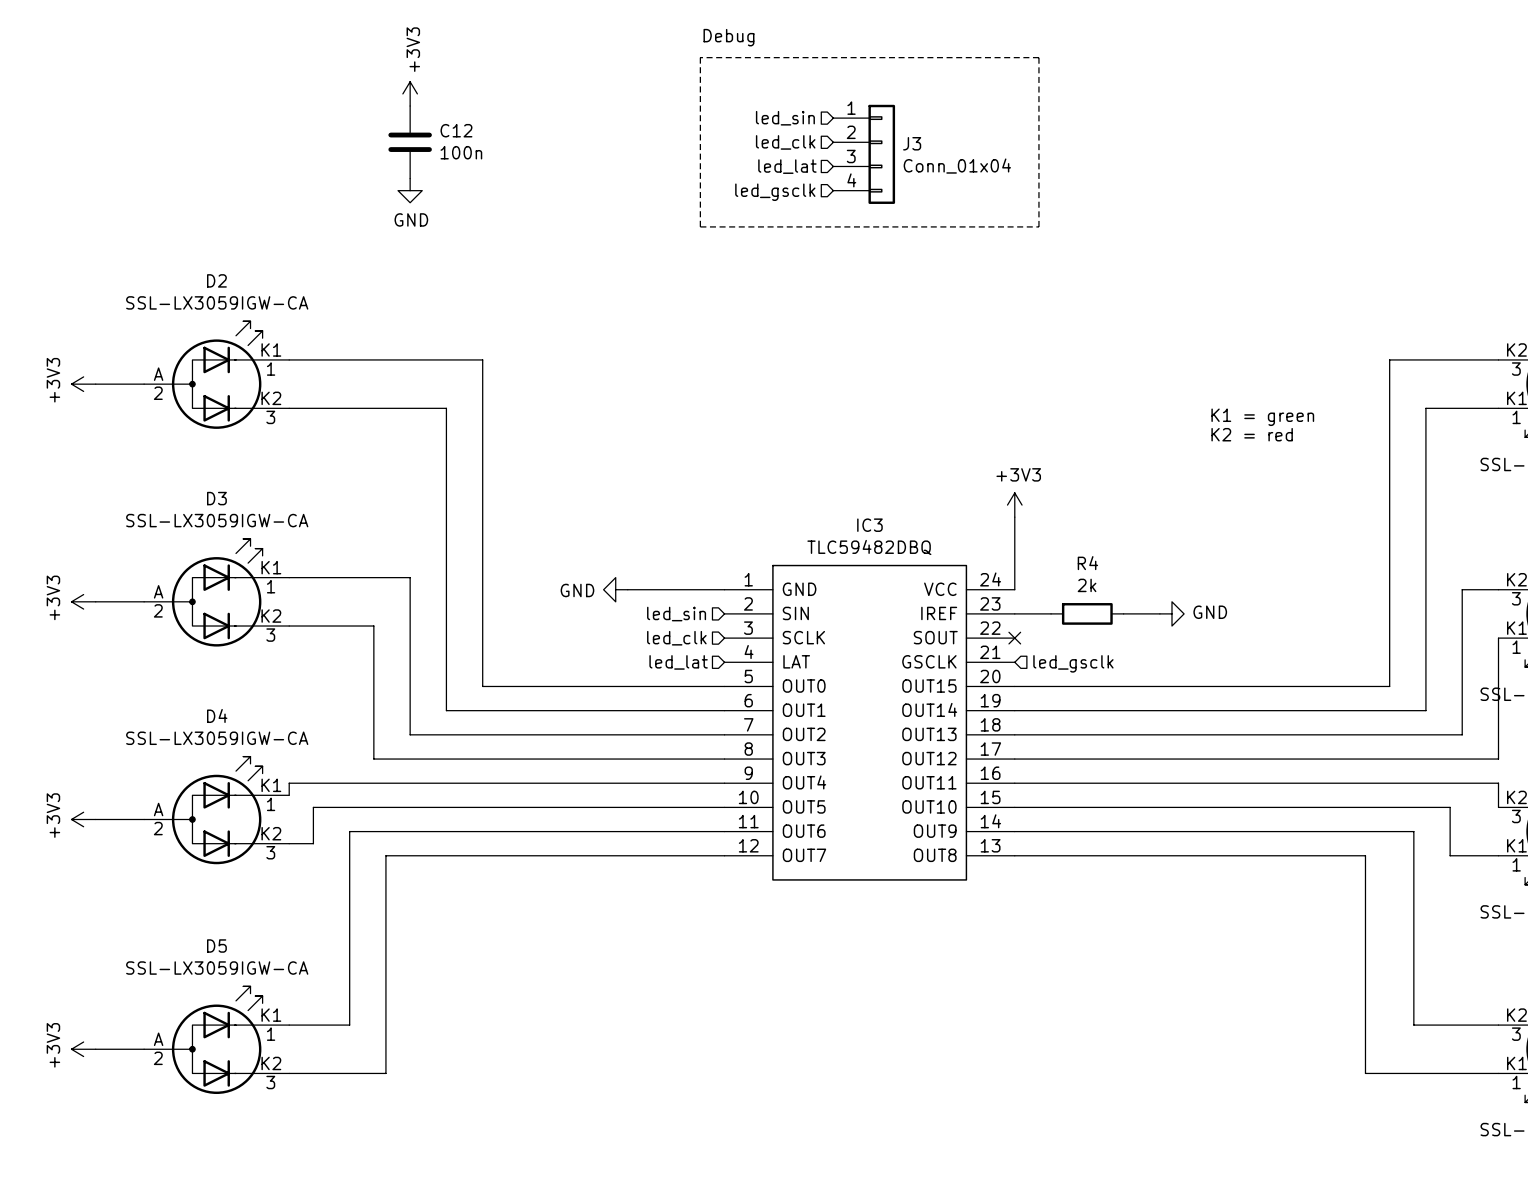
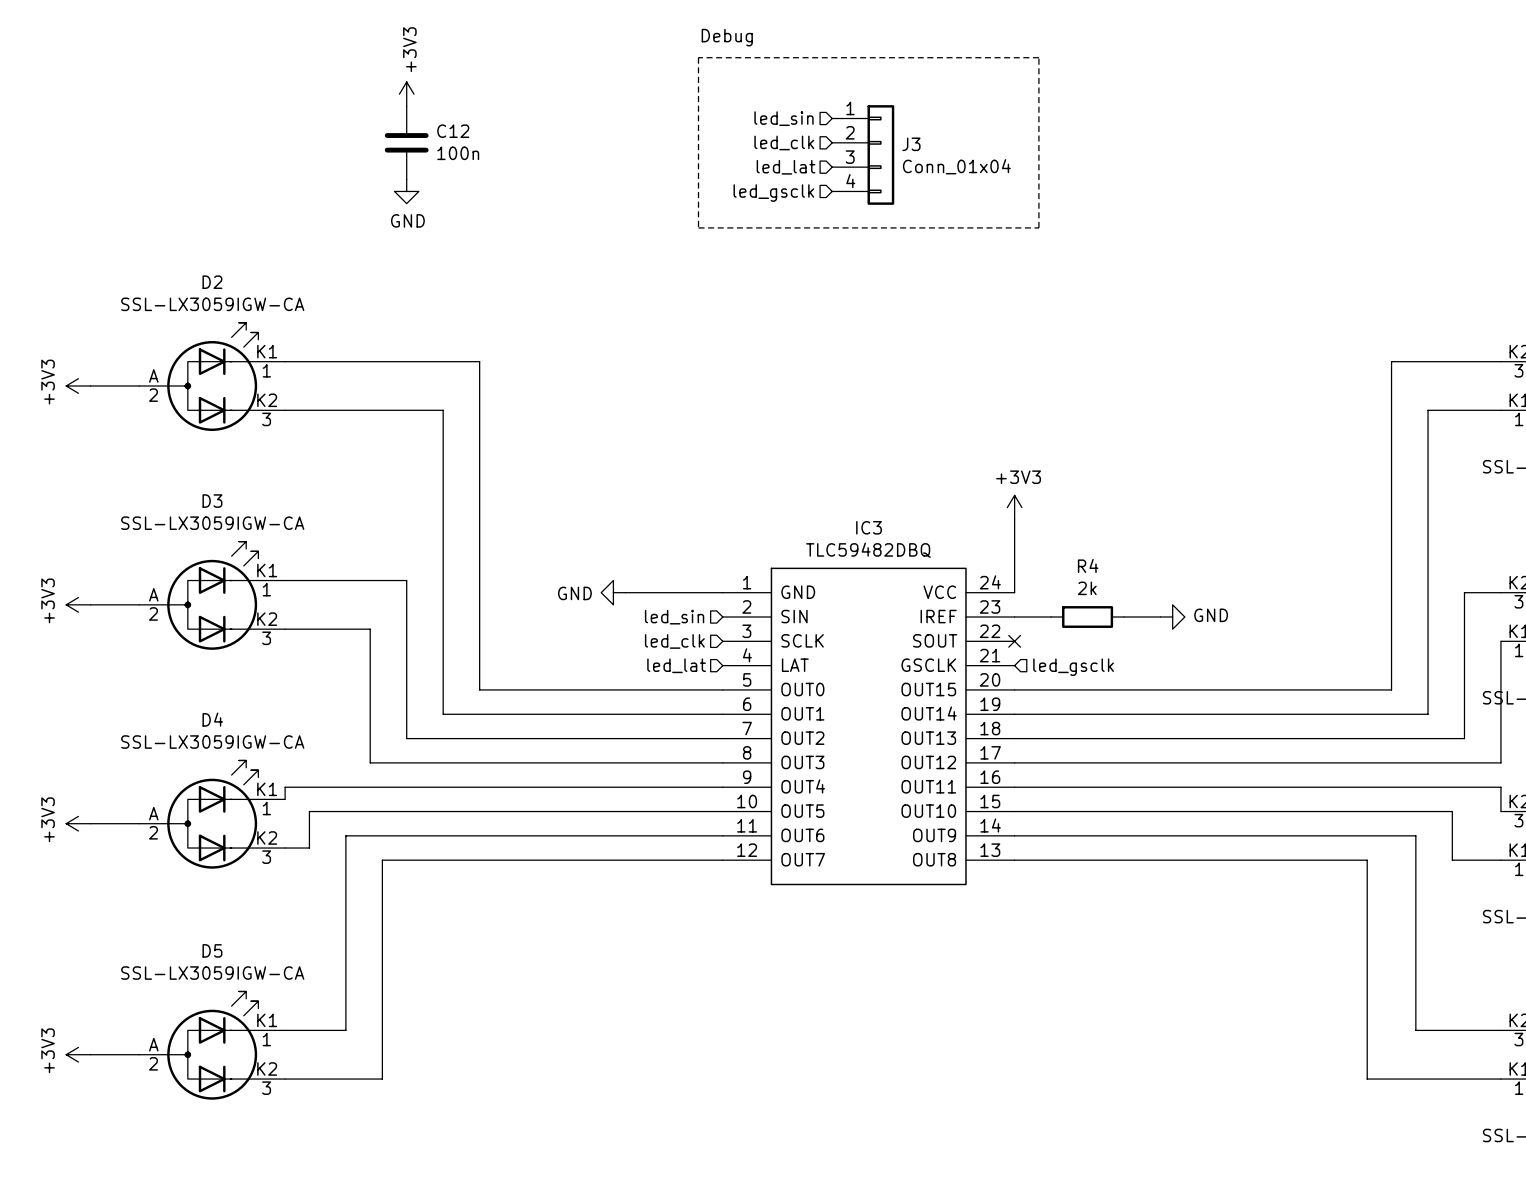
text: K1 = green (1262, 417) -> none
text: K2 = red (1252, 434) -> none

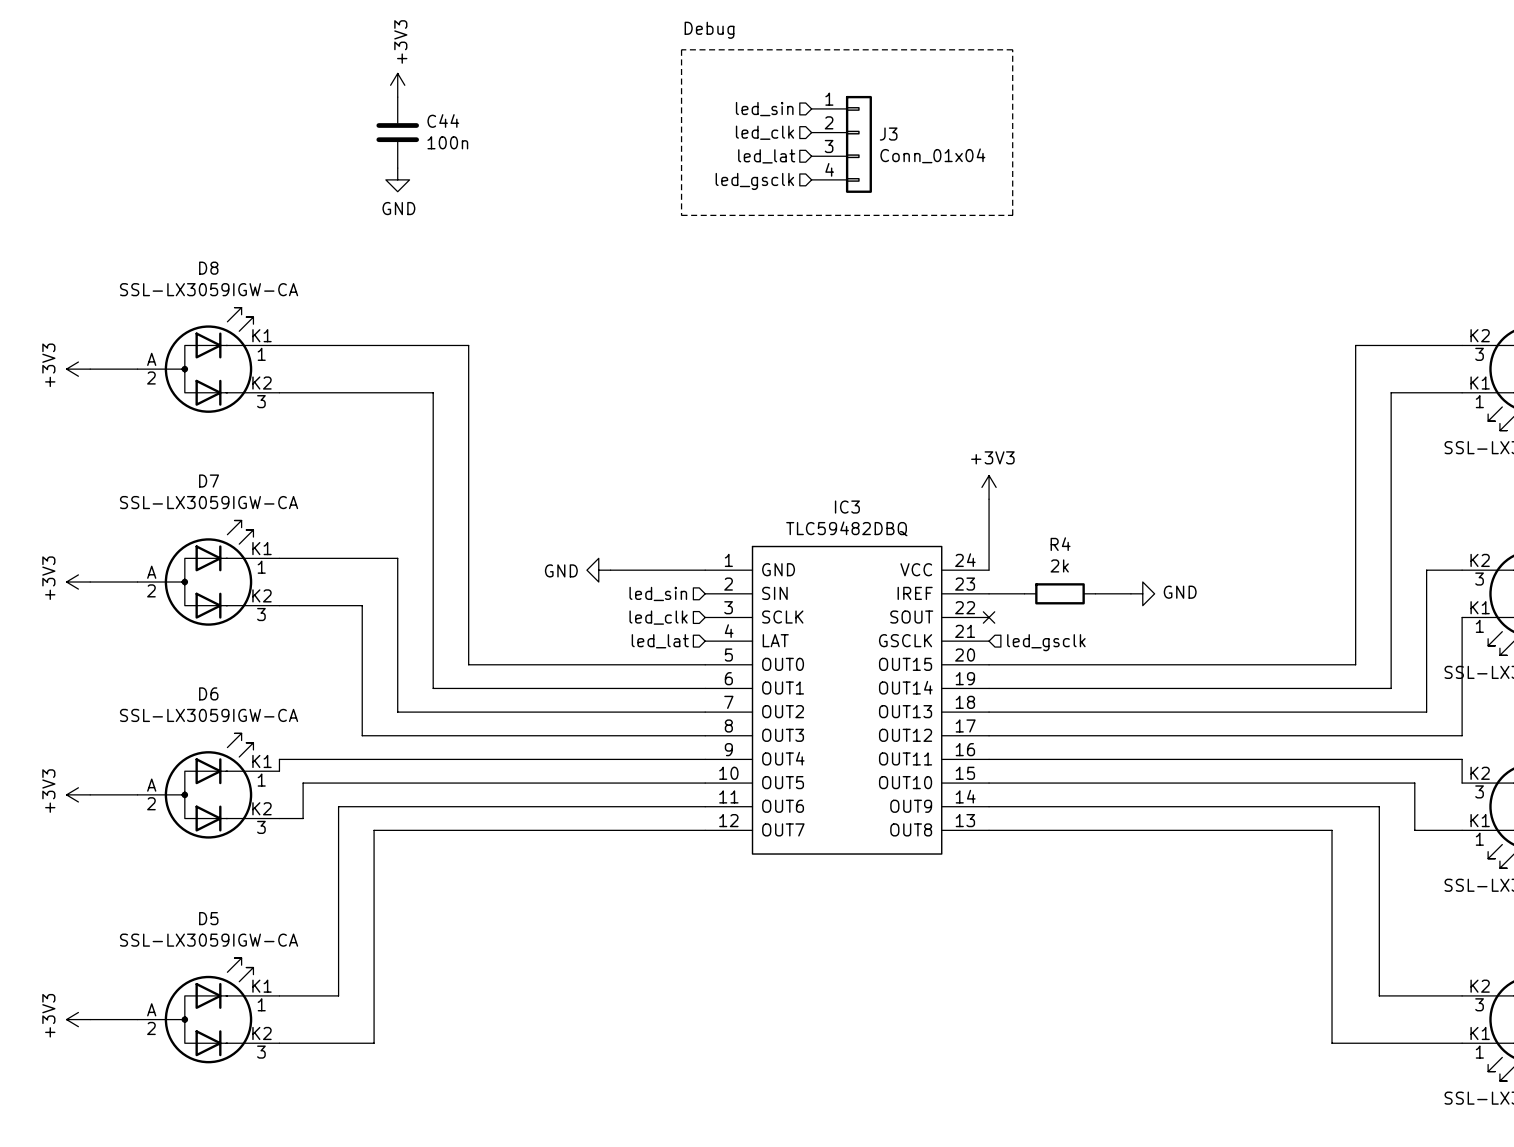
C12 name: C12 (453, 131) -> C44 (443, 120)
D2 name: D2 (212, 282) -> D8 (208, 268)
D3 name: D3 (212, 501) -> D7 (209, 481)
D4 name: D4 (212, 719) -> D6 (208, 693)

